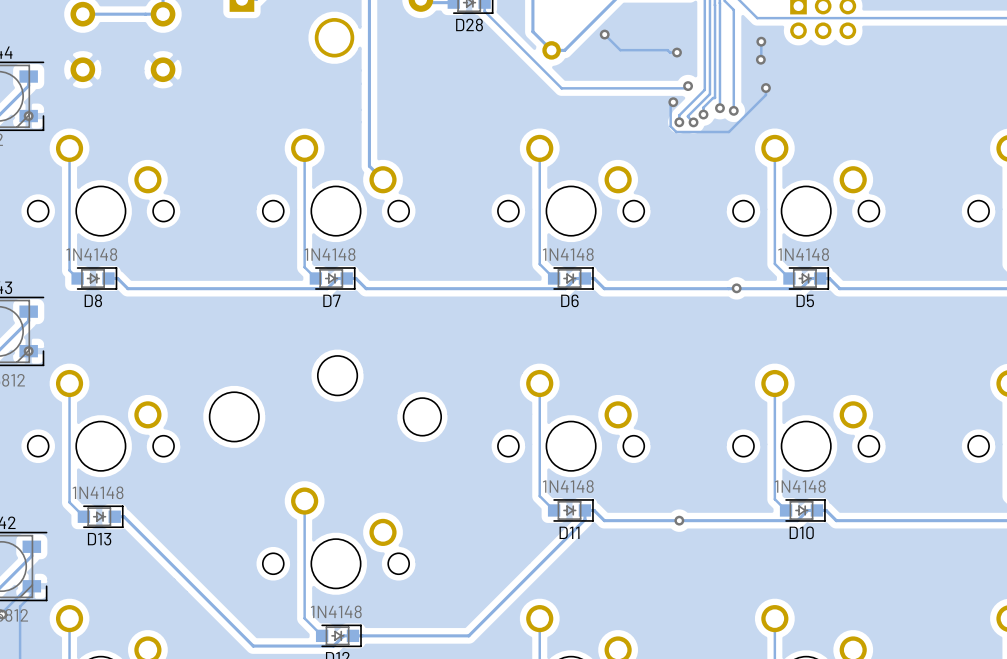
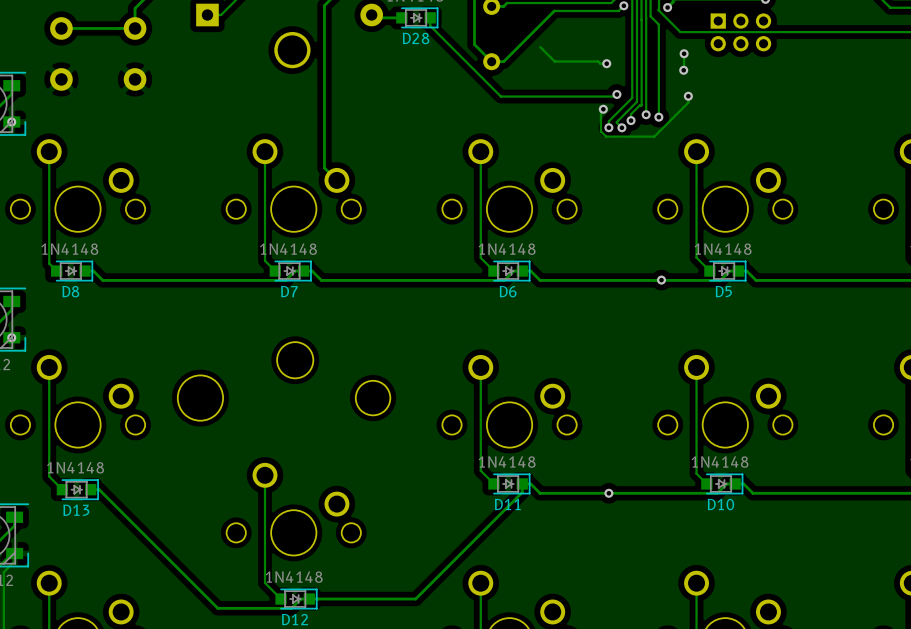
via: (604, 34) -> none

